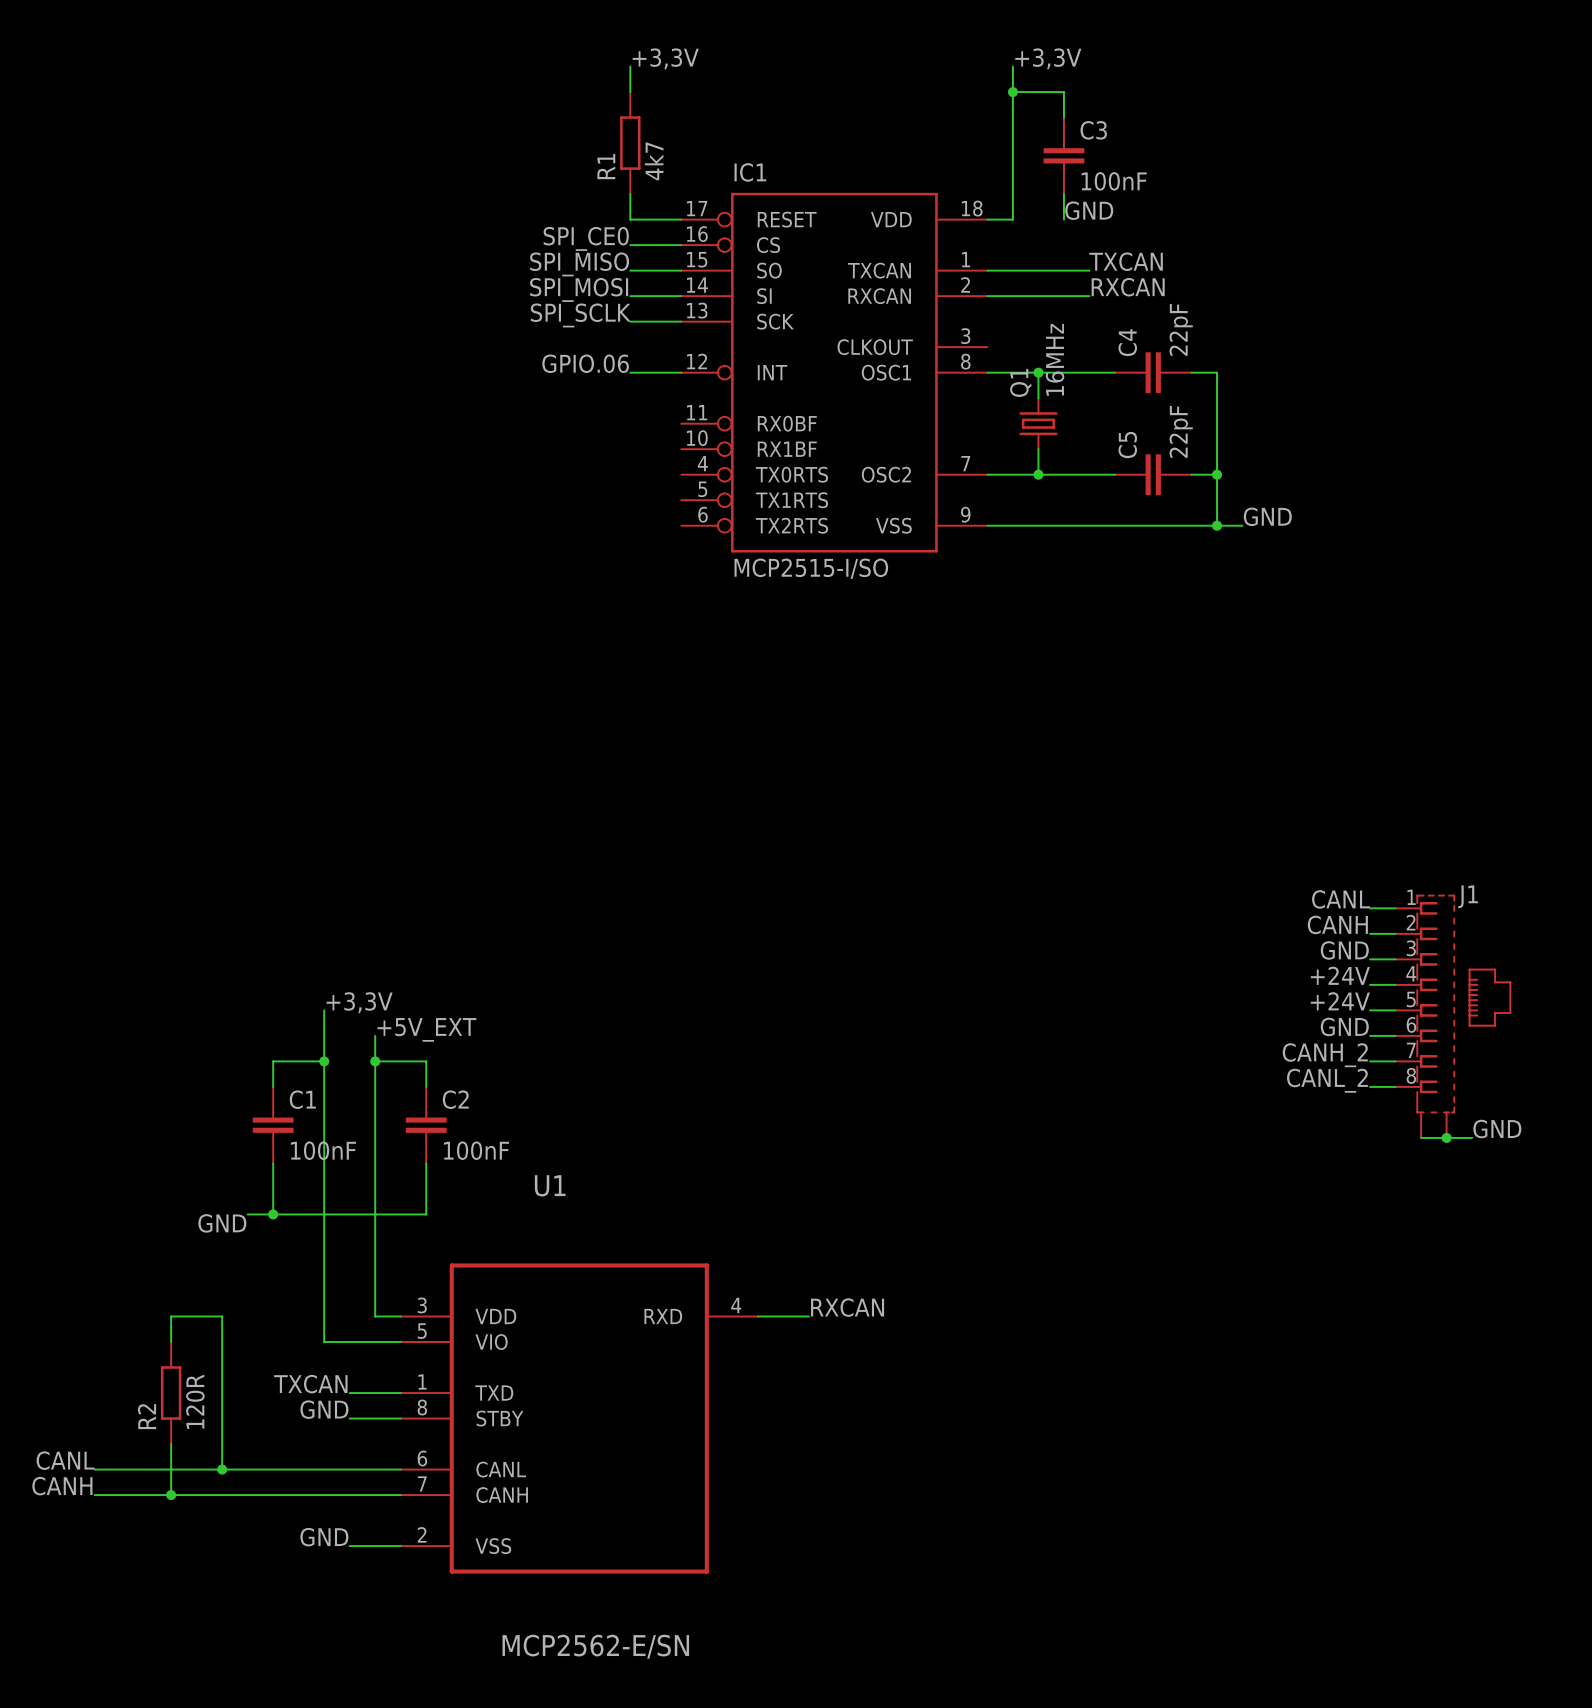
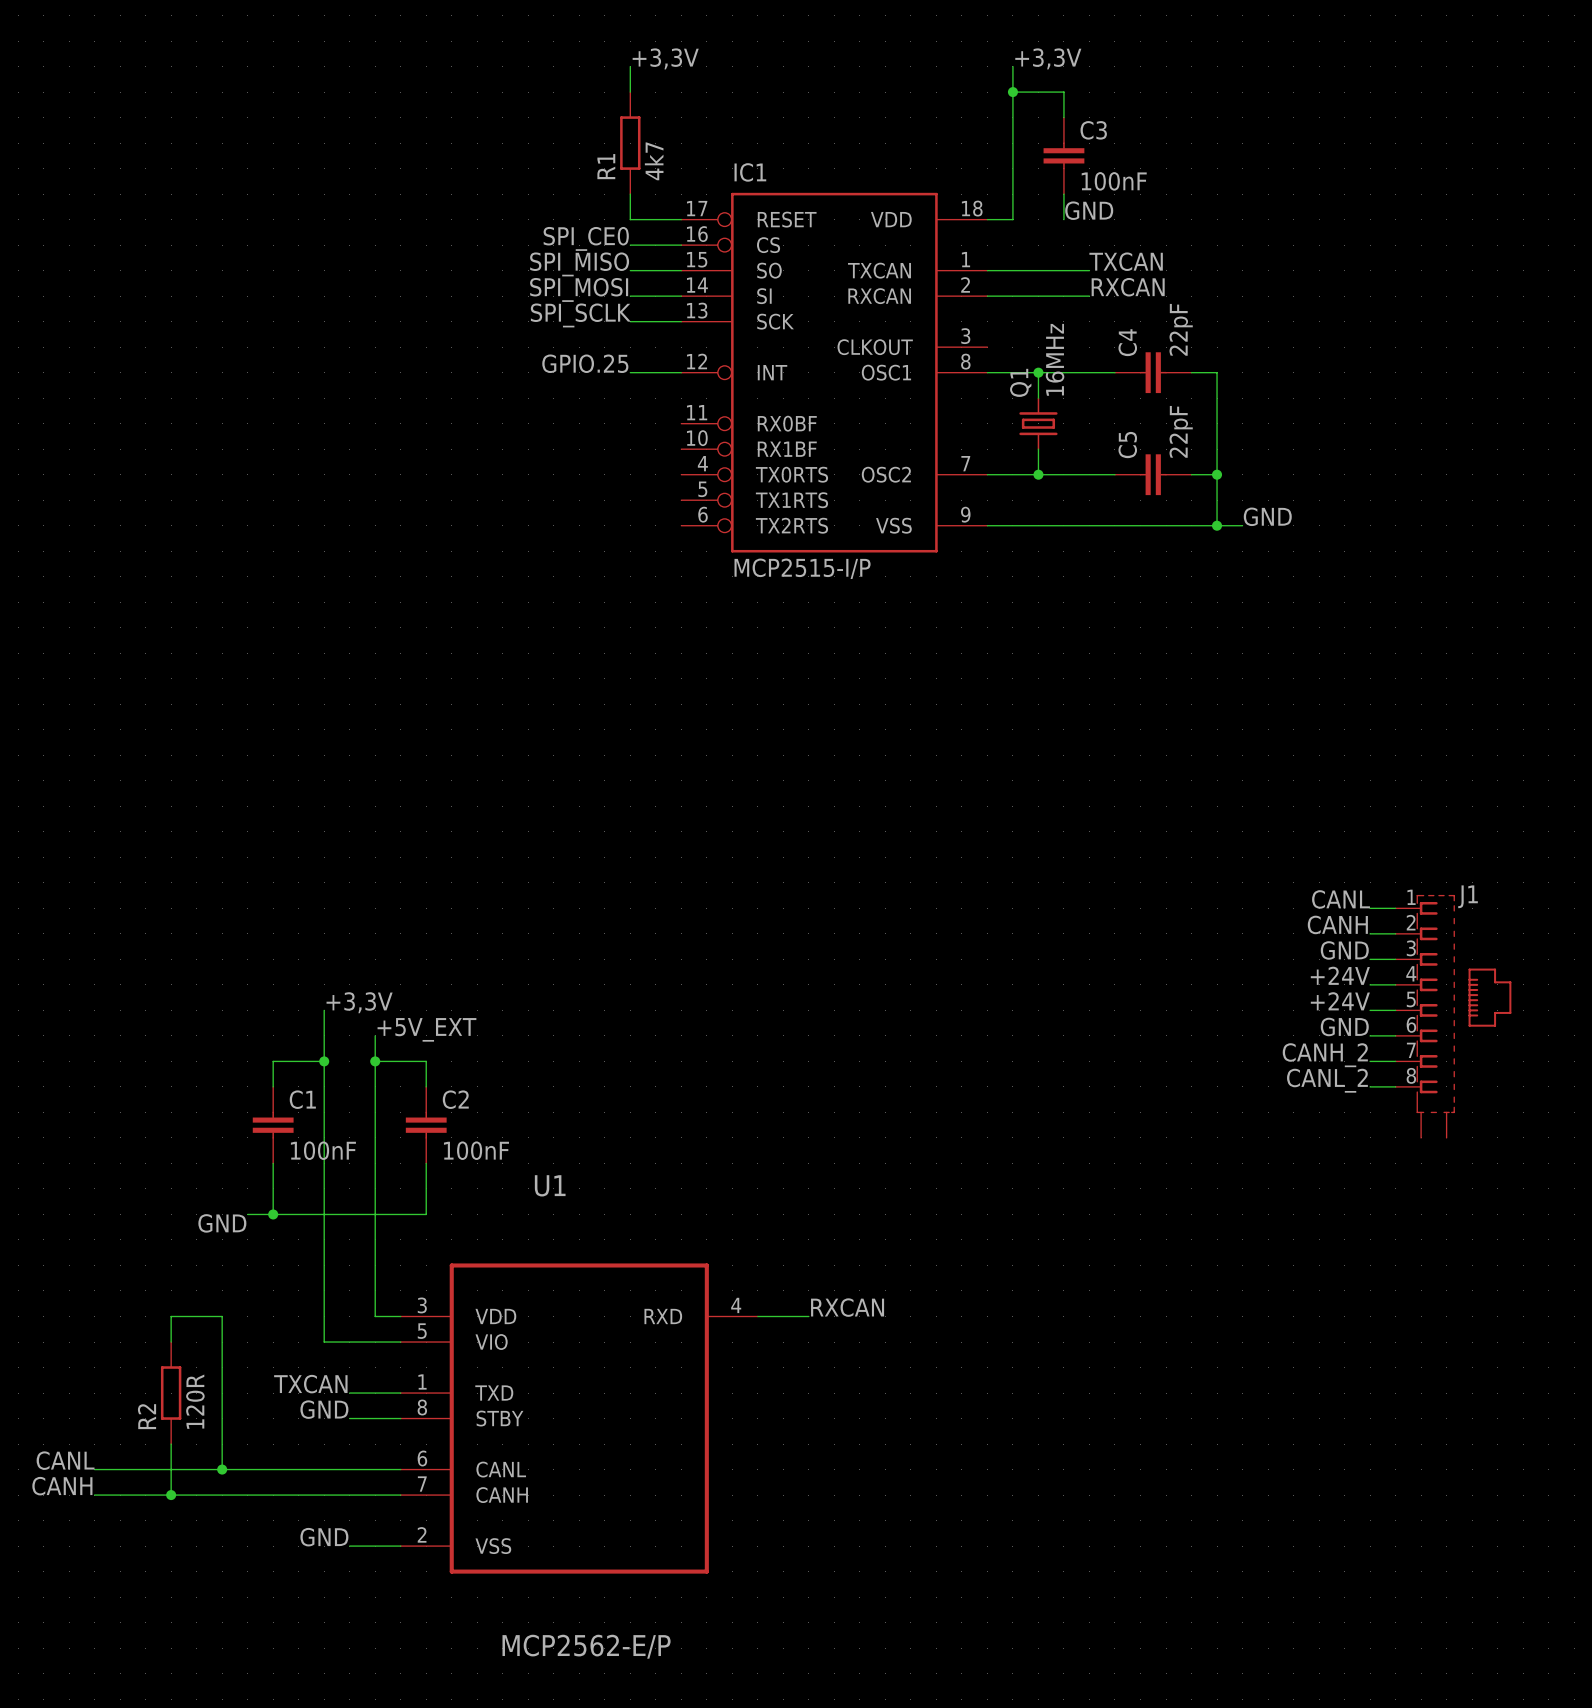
label: GPIO.06 (585, 363) -> GPIO.25 (585, 363)
IC1 value: MCP2515-I/SO (811, 568) -> MCP2515-I/P (802, 568)
label: GND (1497, 1129) -> none
wire: (1421, 1137) (1472, 1137) -> none
junction: (1446, 1137) -> none
U1 value: MCP2562-E/SN (595, 1646) -> MCP2562-E/P (586, 1646)

